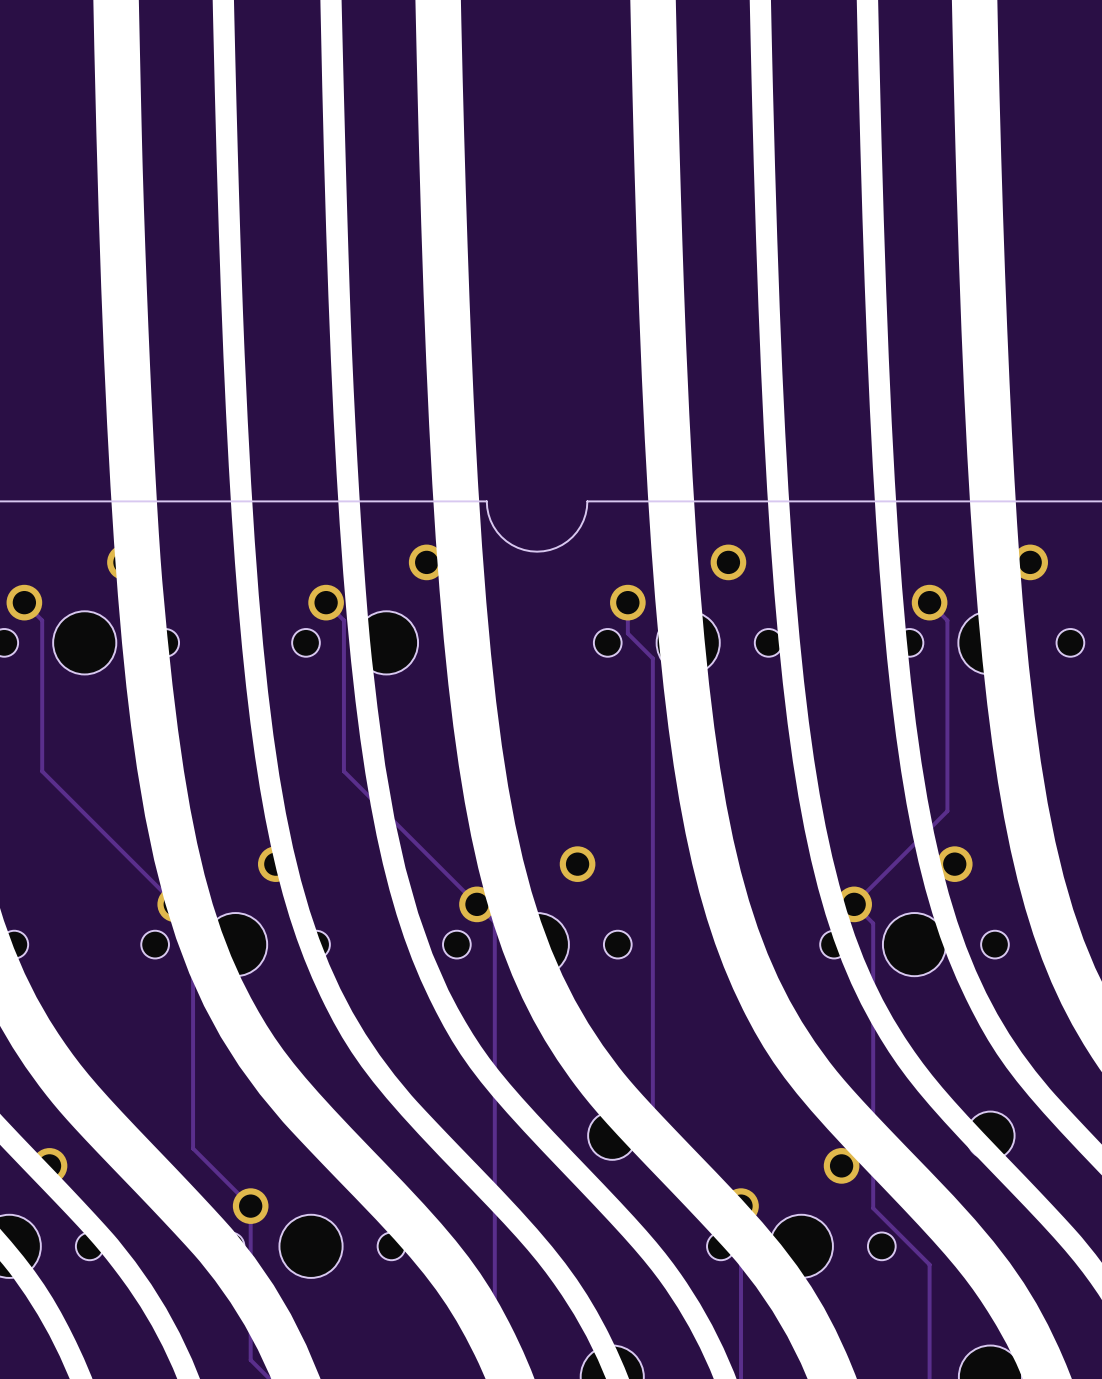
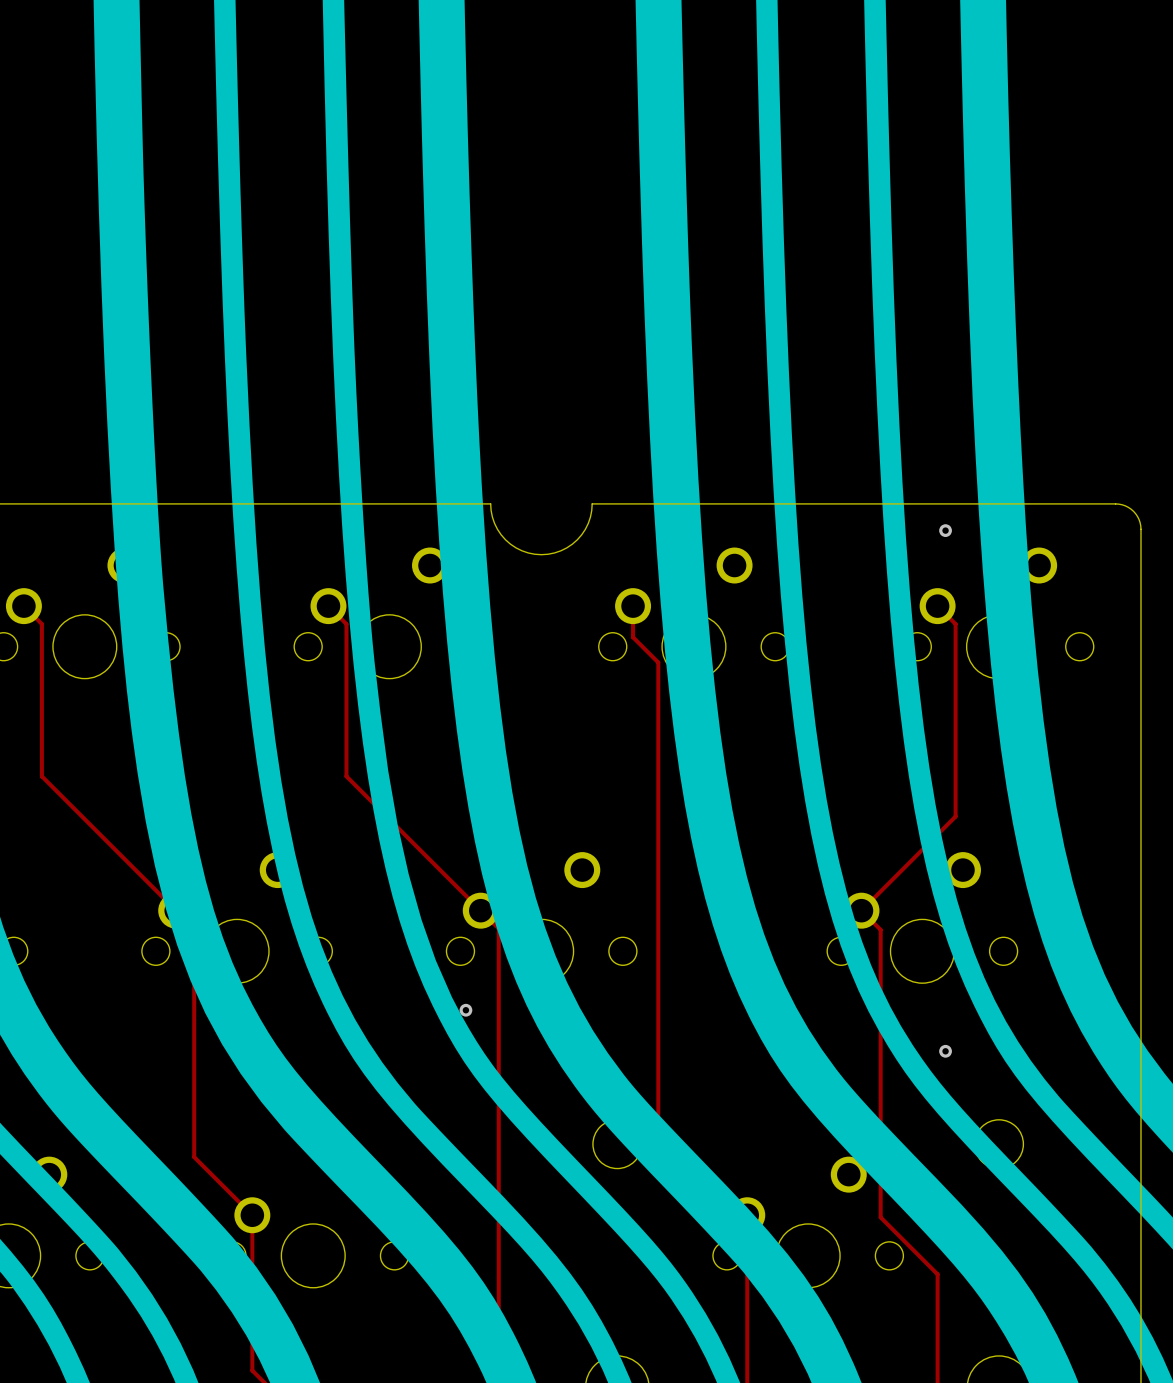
via: none -> (945, 530)
via: none -> (465, 1010)
via: none -> (945, 1051)

